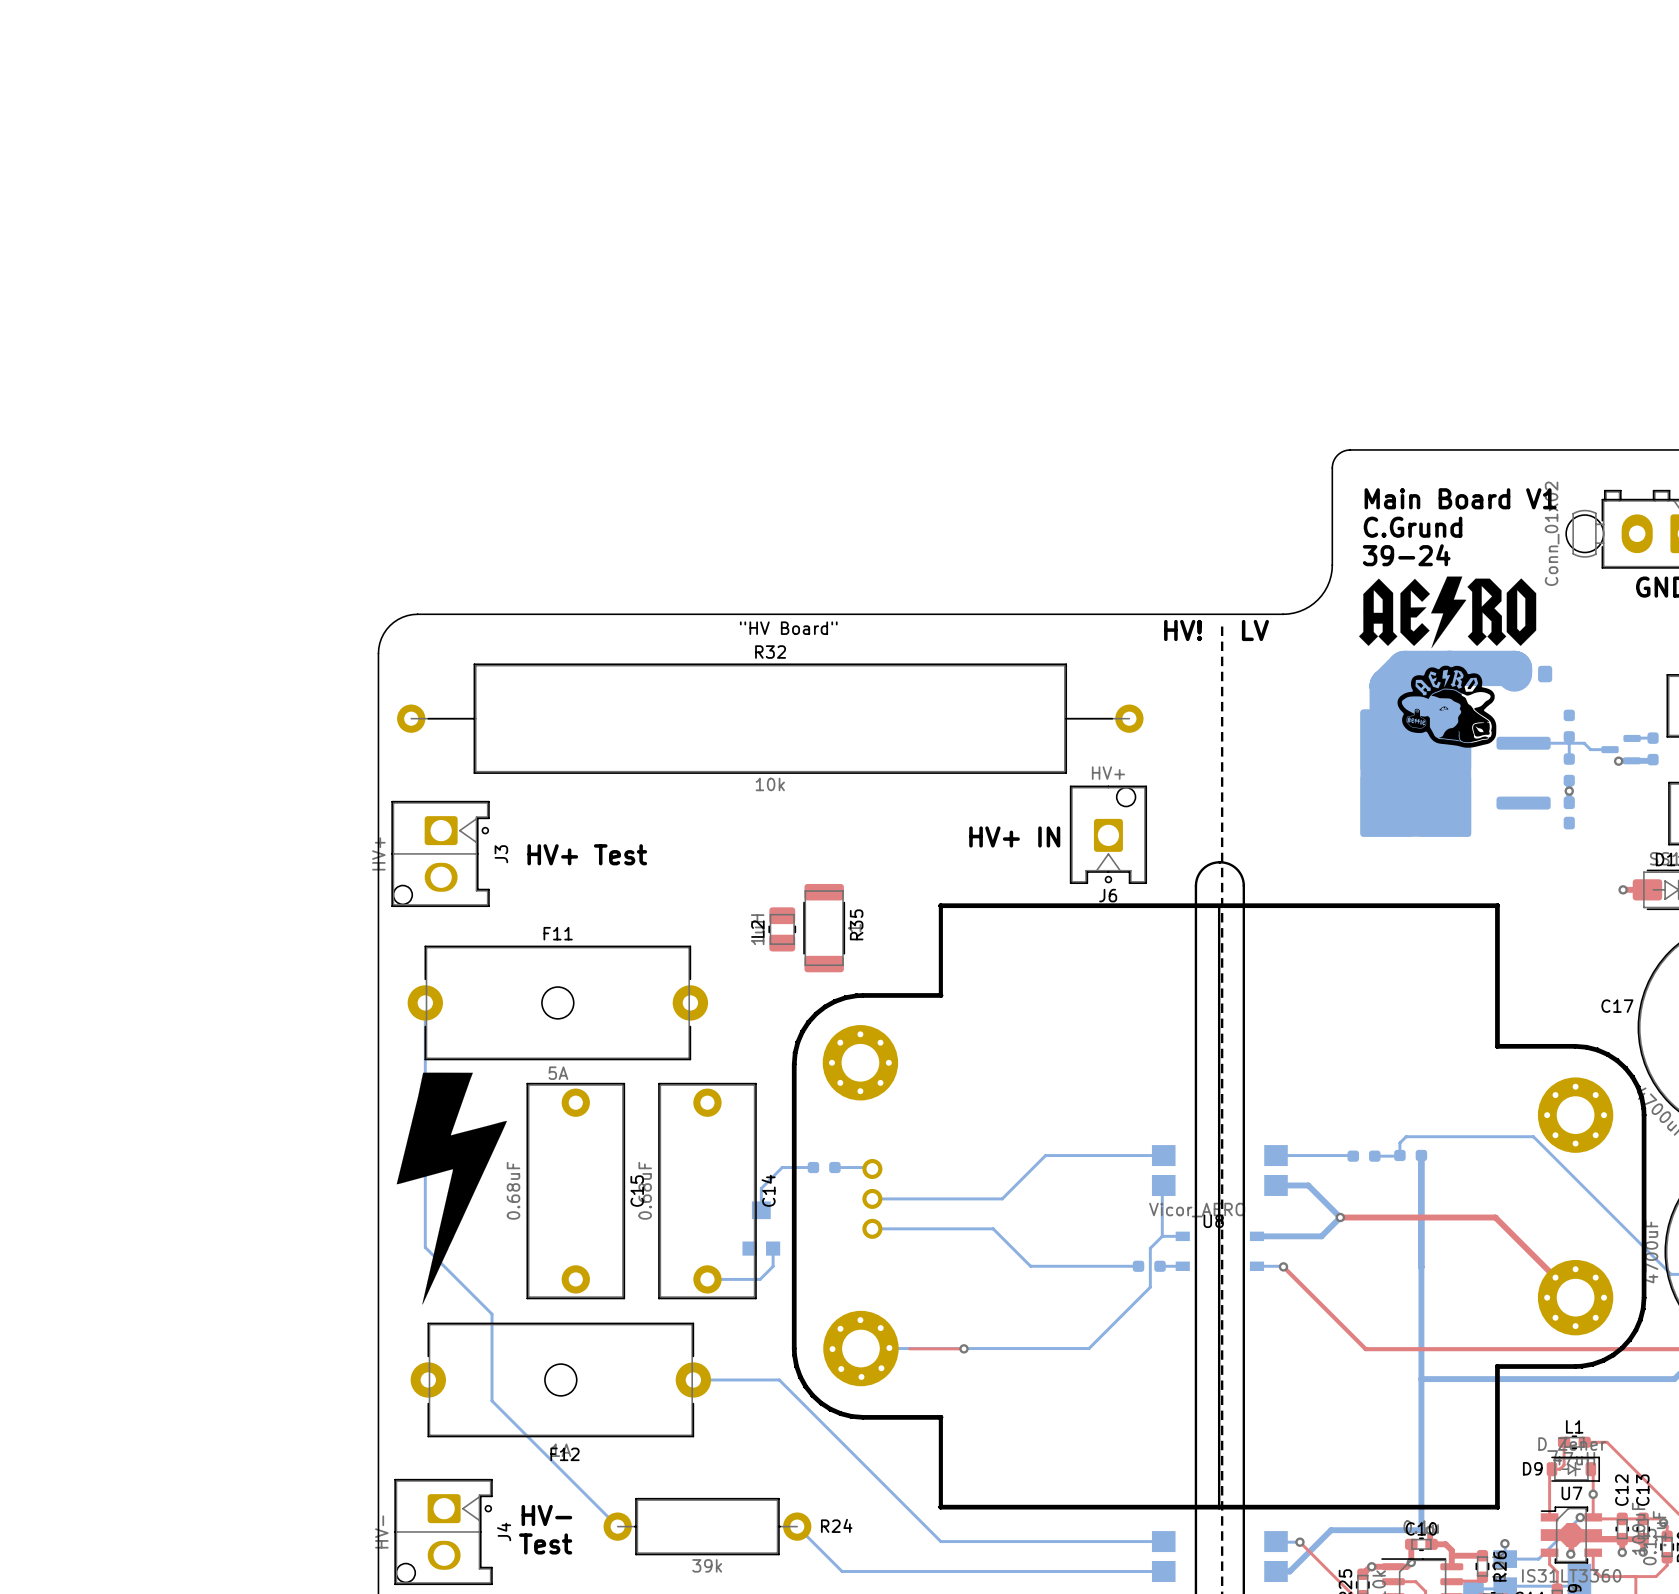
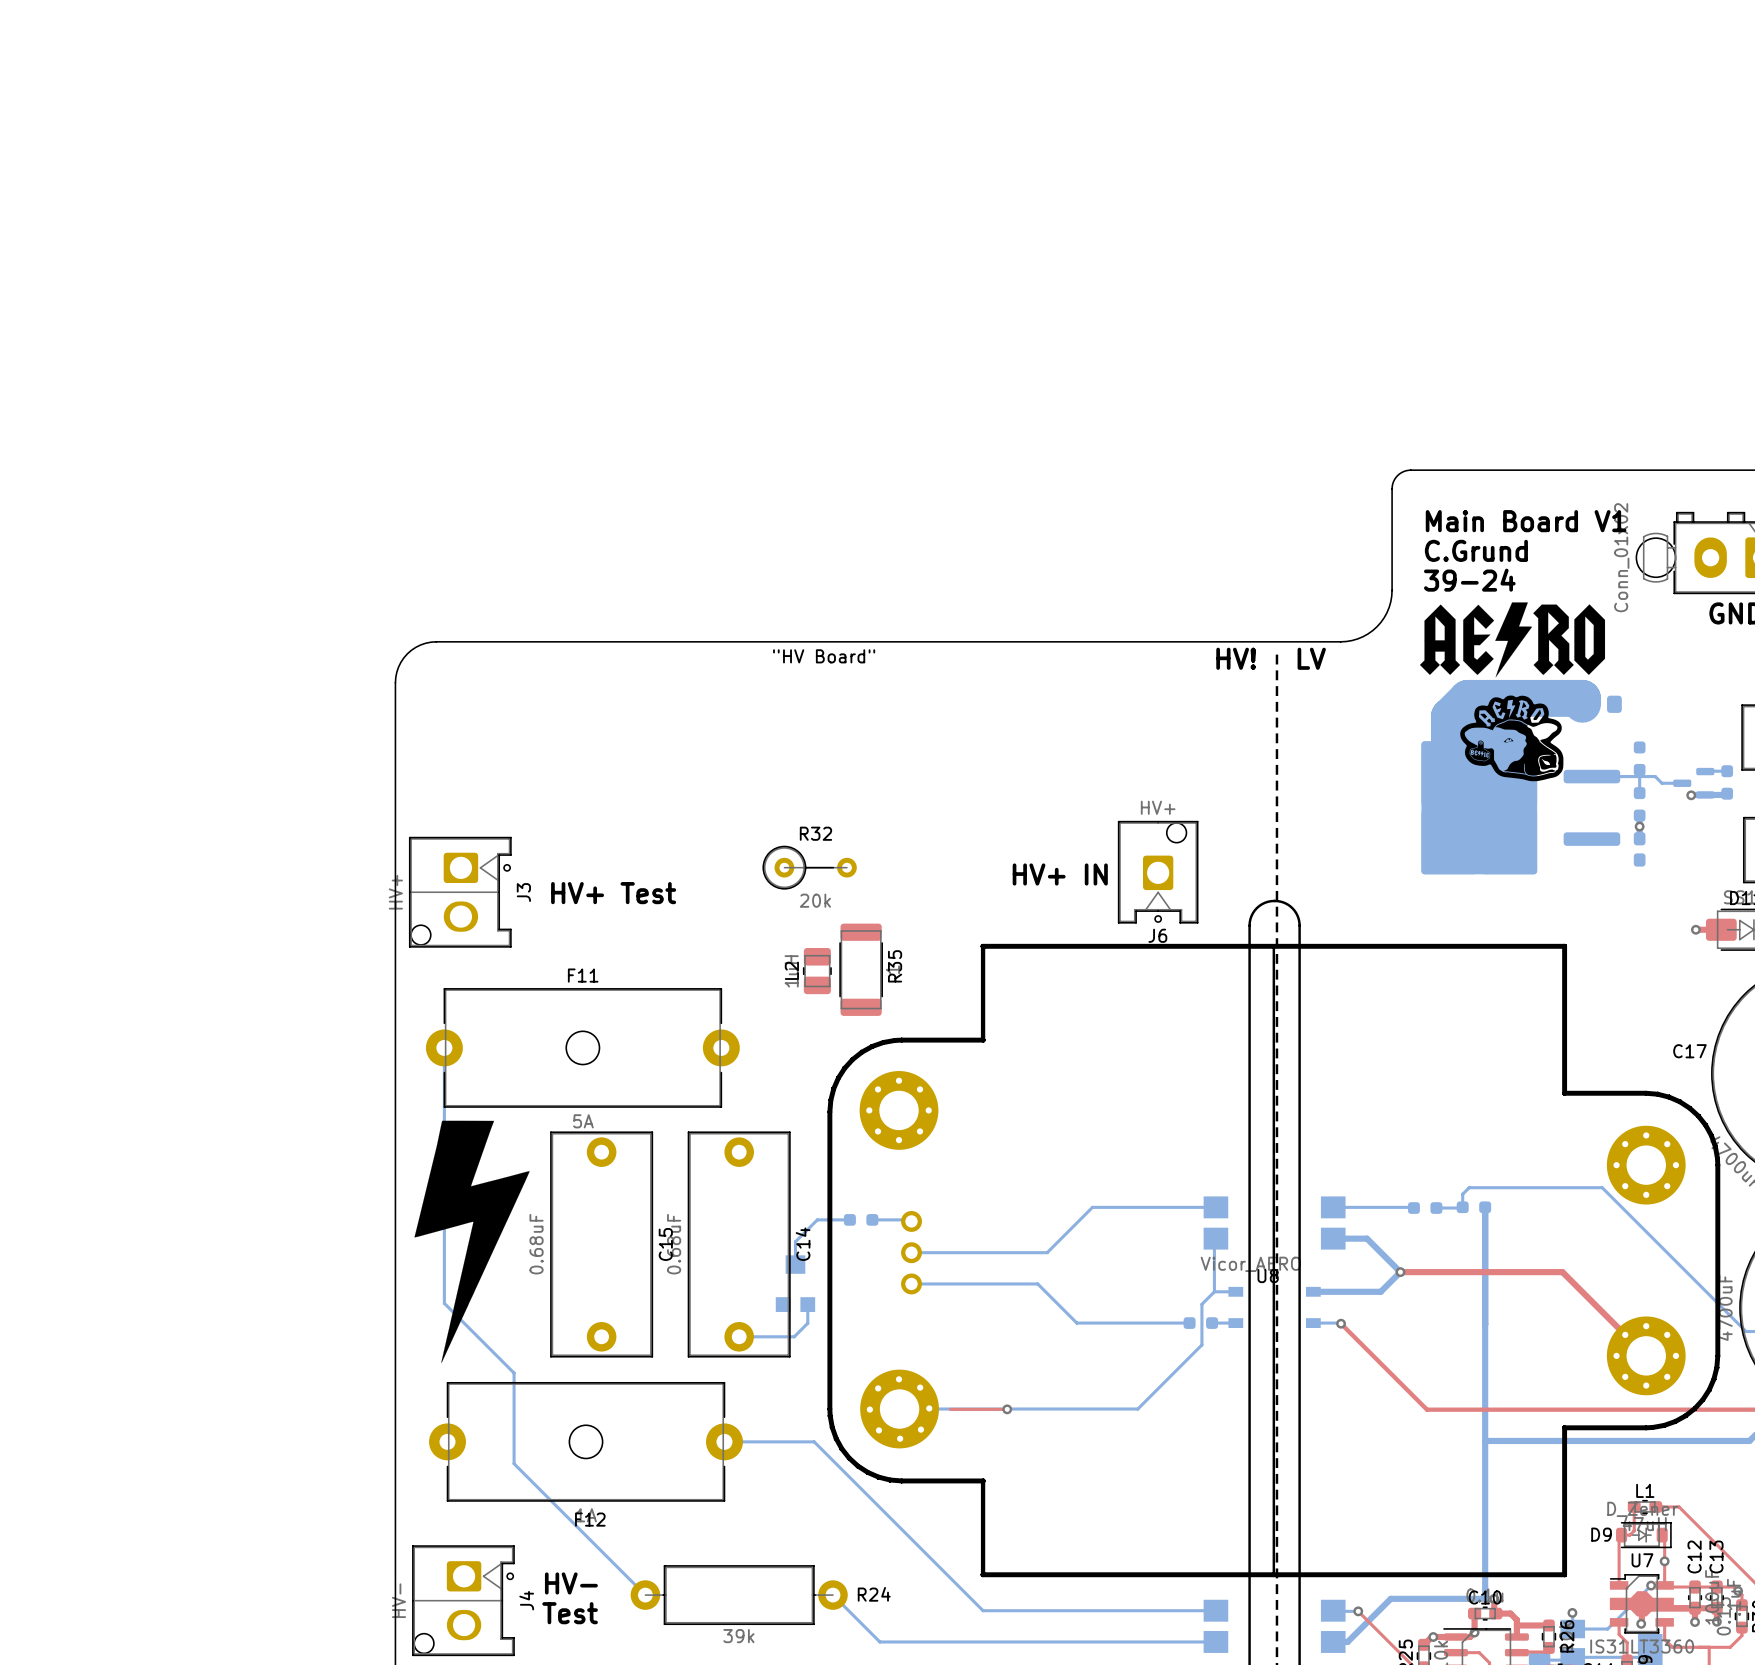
R32 name position: R32 (770, 652) -> R32 (815, 833)
R32 footprint: [397, 663, 1144, 774] -> [762, 845, 857, 890]
R32 value: 10k (770, 784) -> 20k (815, 900)

